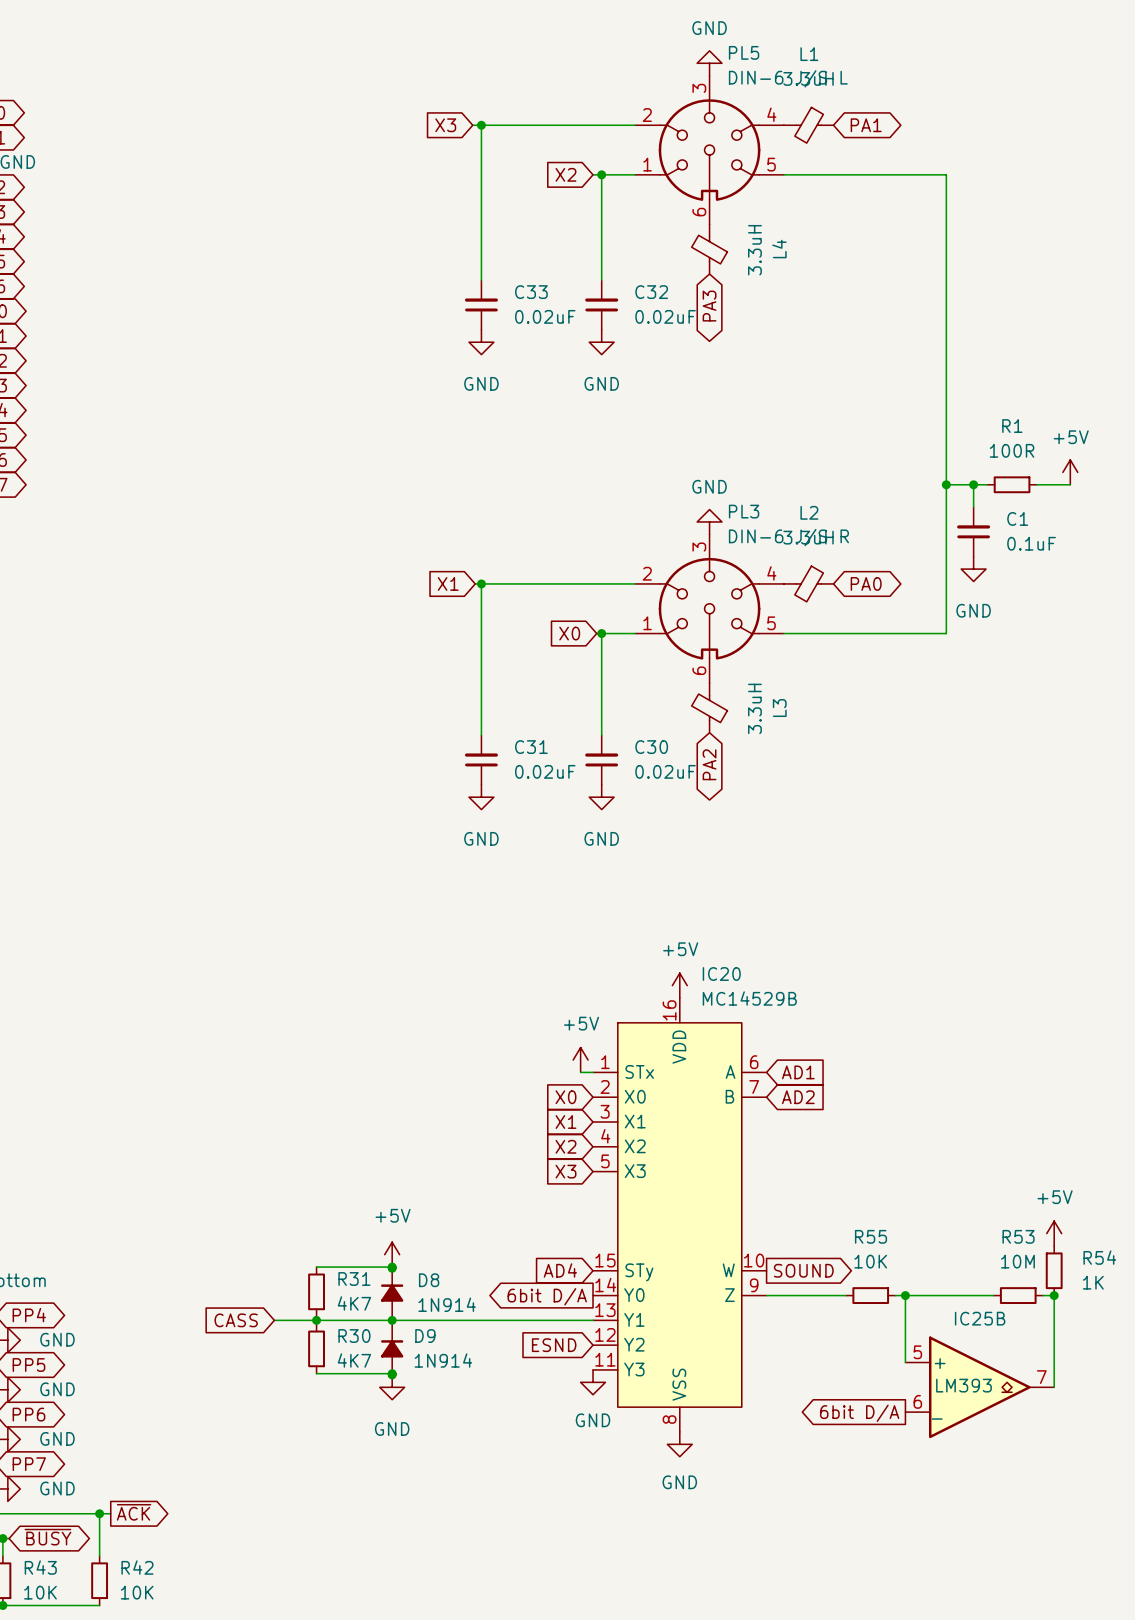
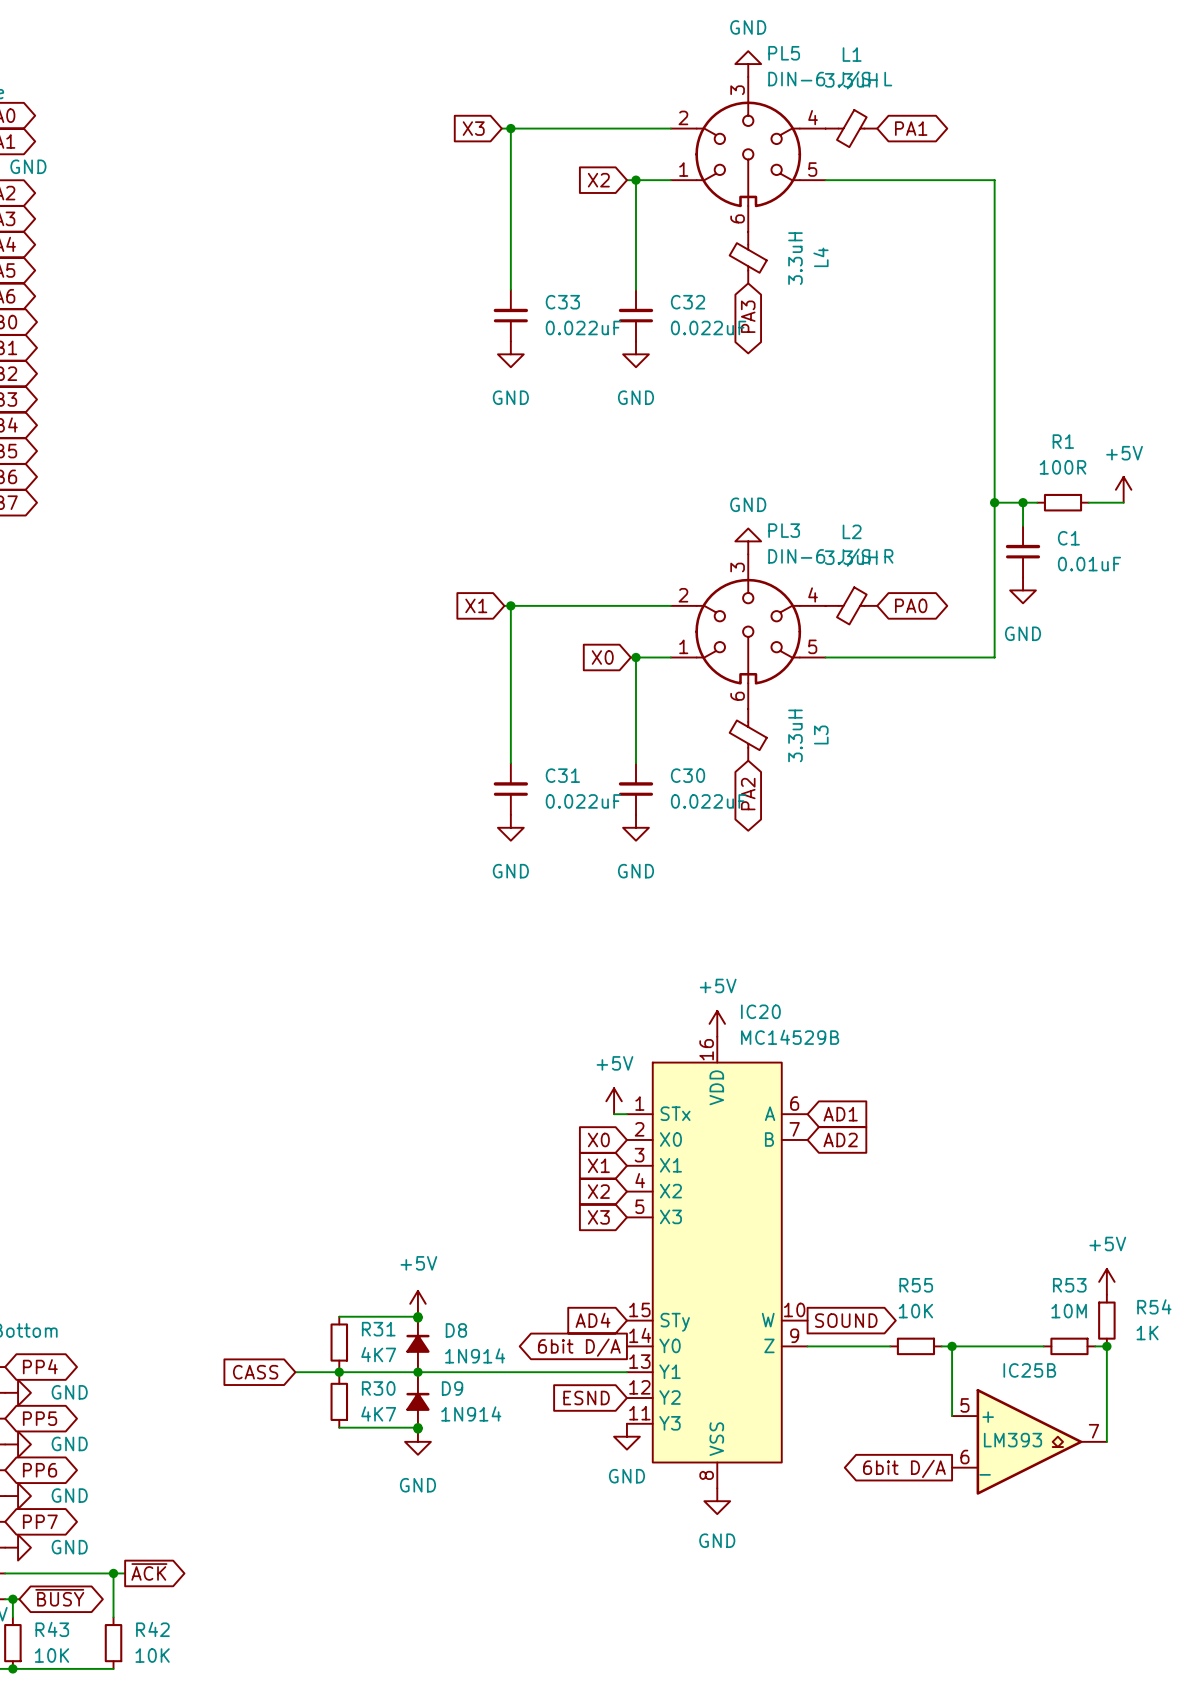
C33 value: 0.02uF (545, 316) -> 0.022uF (583, 327)
C32 value: 0.02uF (665, 316) -> 0.022uF (708, 327)
C1 value: 0.1uF (1031, 543) -> 0.01uF (1089, 564)
C31 value: 0.02uF (545, 771) -> 0.022uF (583, 801)
C30 value: 0.02uF (665, 771) -> 0.022uF (708, 801)

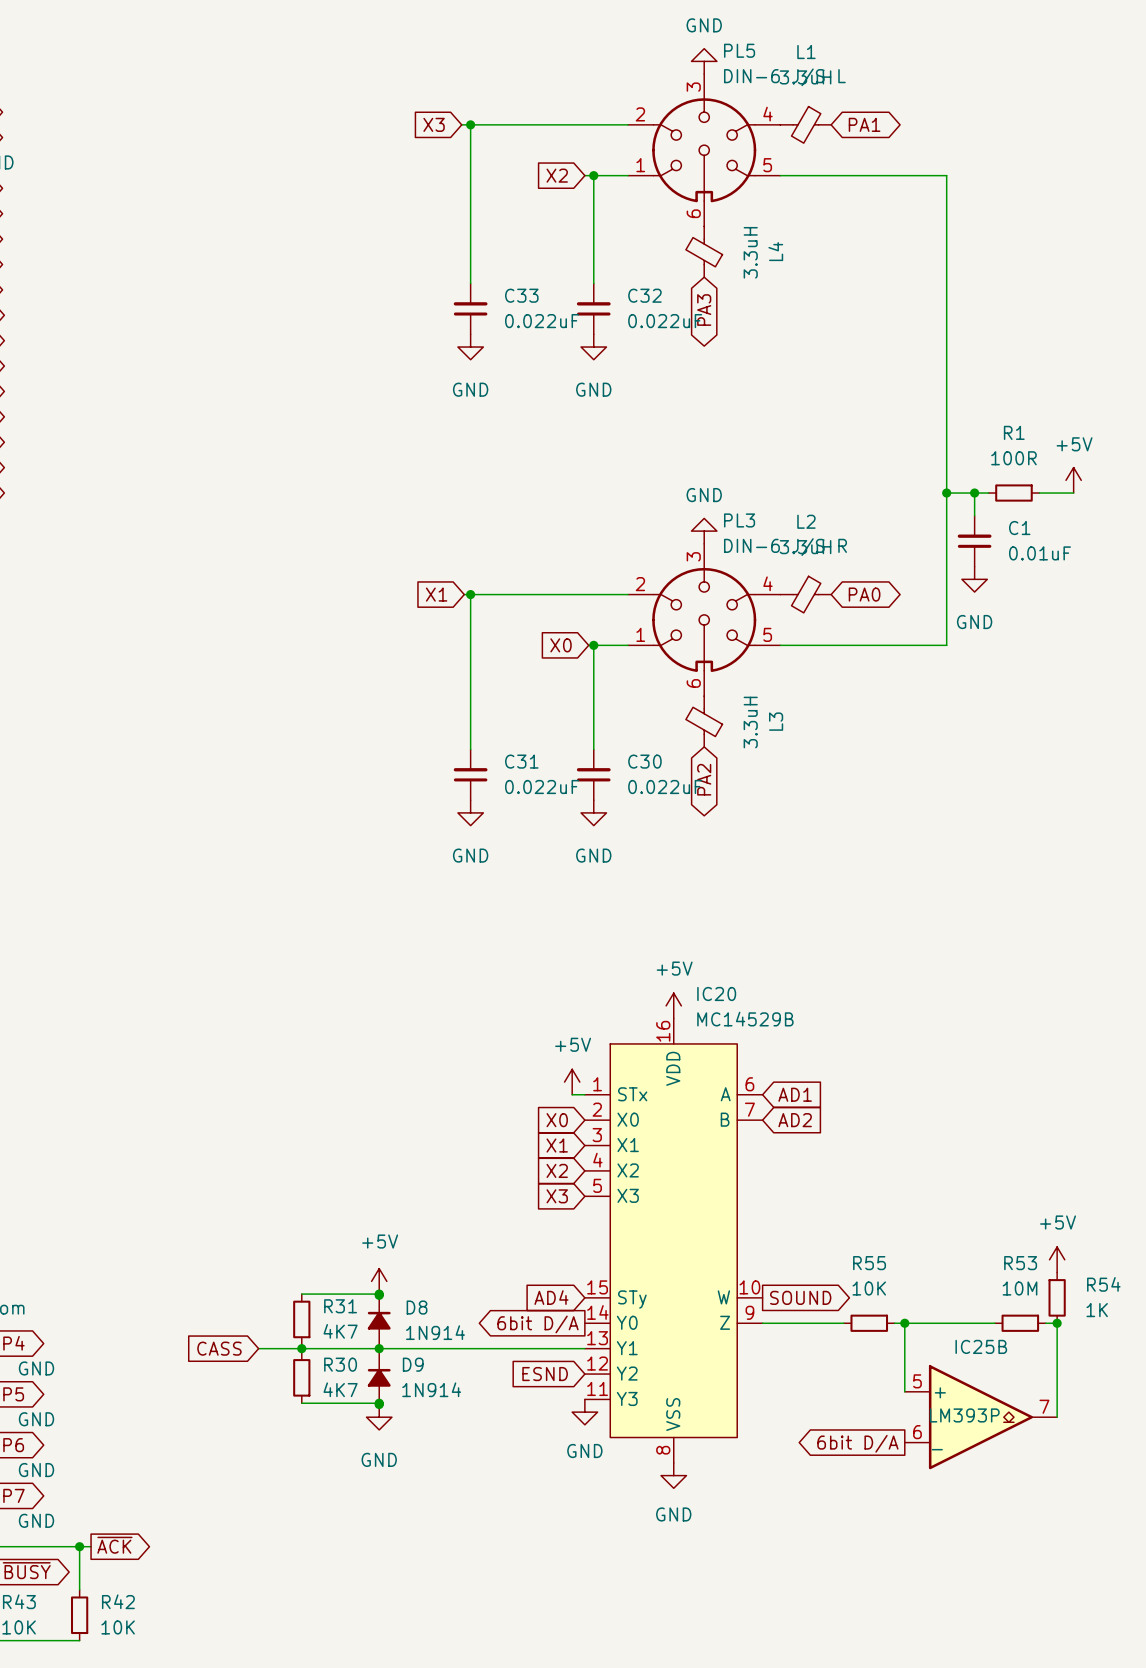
IC25B value: LM393 (1013, 1440) -> LM393P (964, 1415)

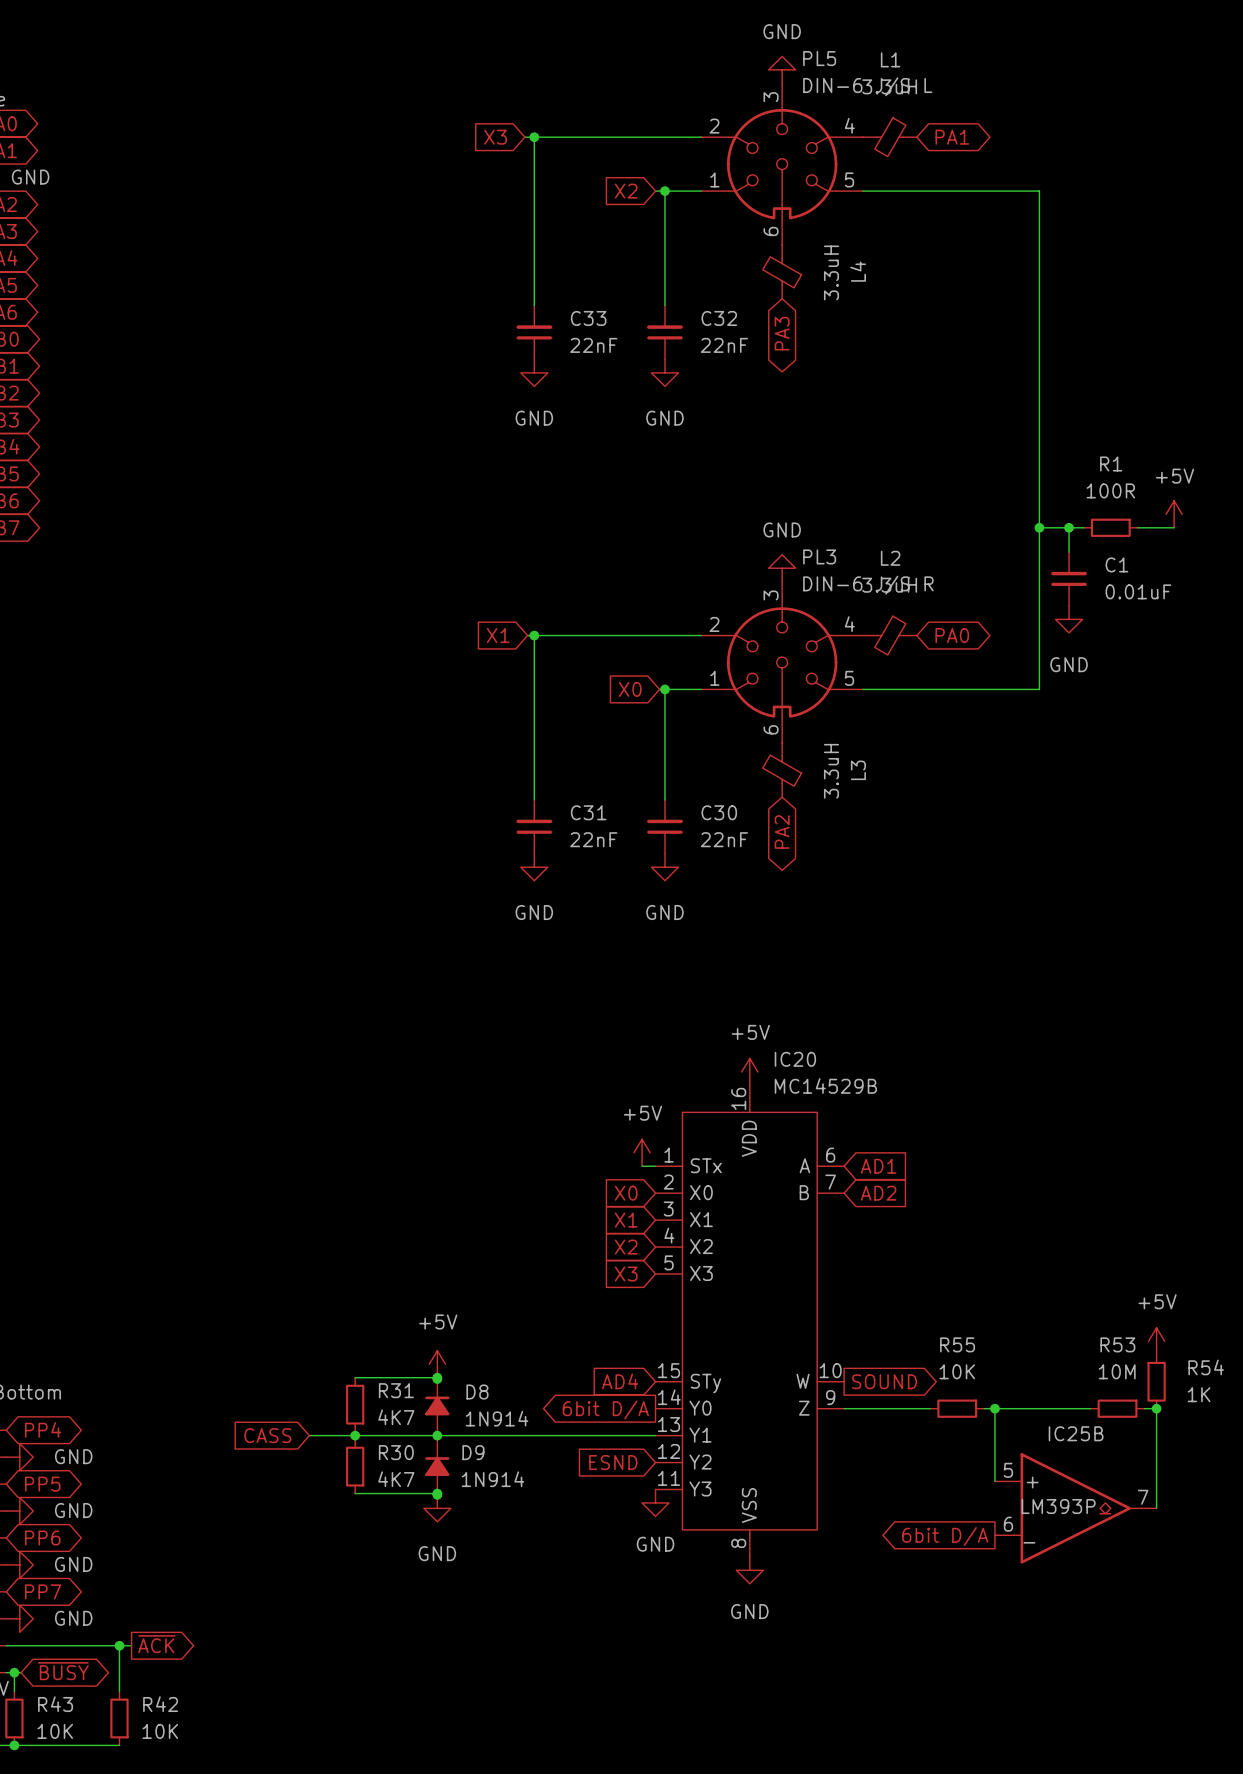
C33 value: 0.022uF (542, 321) -> 22nF (593, 345)
C32 value: 0.022uF (665, 321) -> 22nF (724, 345)
C31 value: 0.022uF (542, 787) -> 22nF (593, 839)
C30 value: 0.022uF (665, 787) -> 22nF (724, 839)

